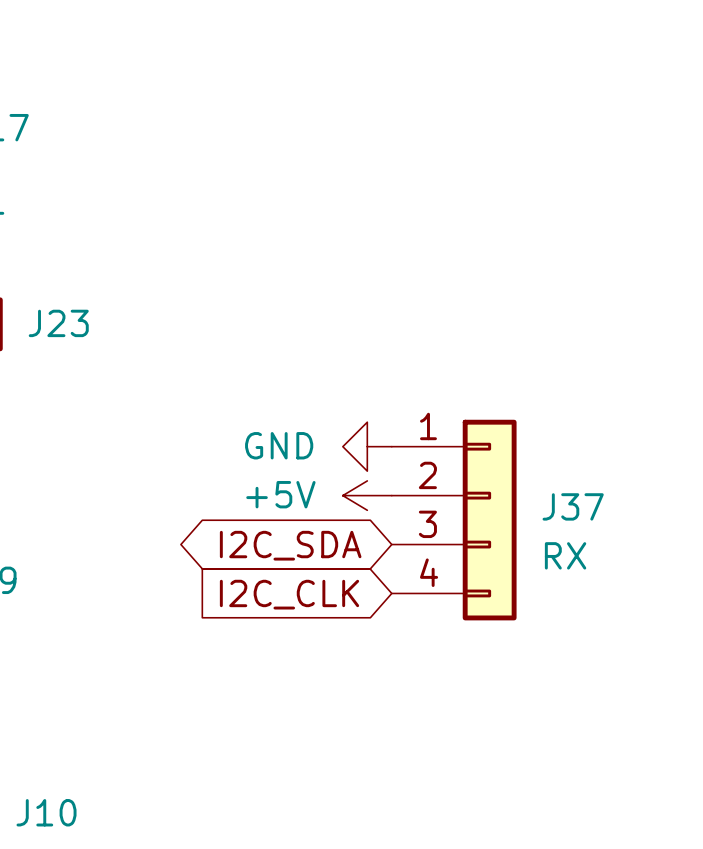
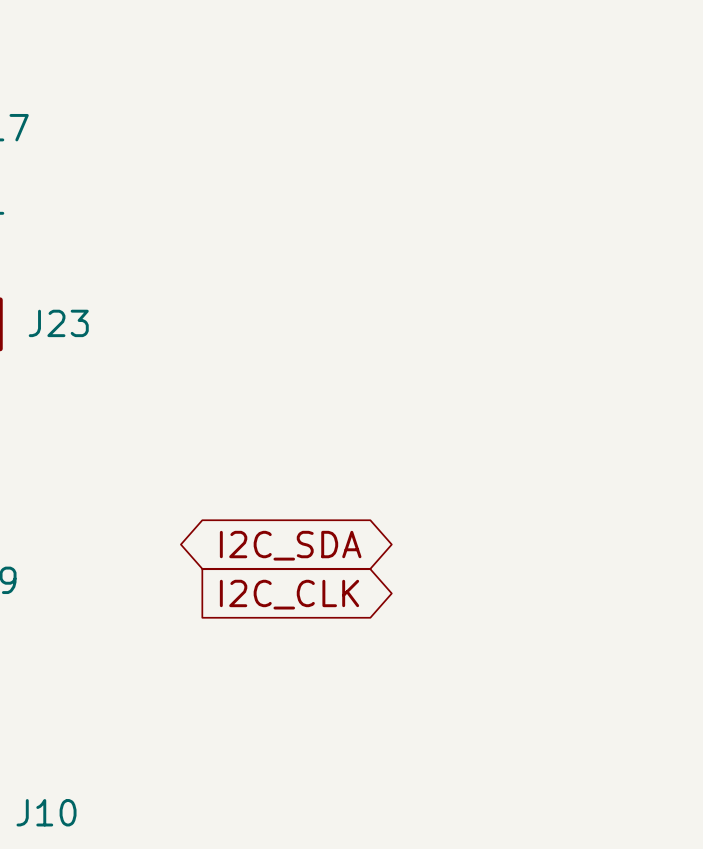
power symbol: GND (367, 446) -> none
power symbol: +5V (367, 495) -> none
J37: RX (454, 520) -> none

